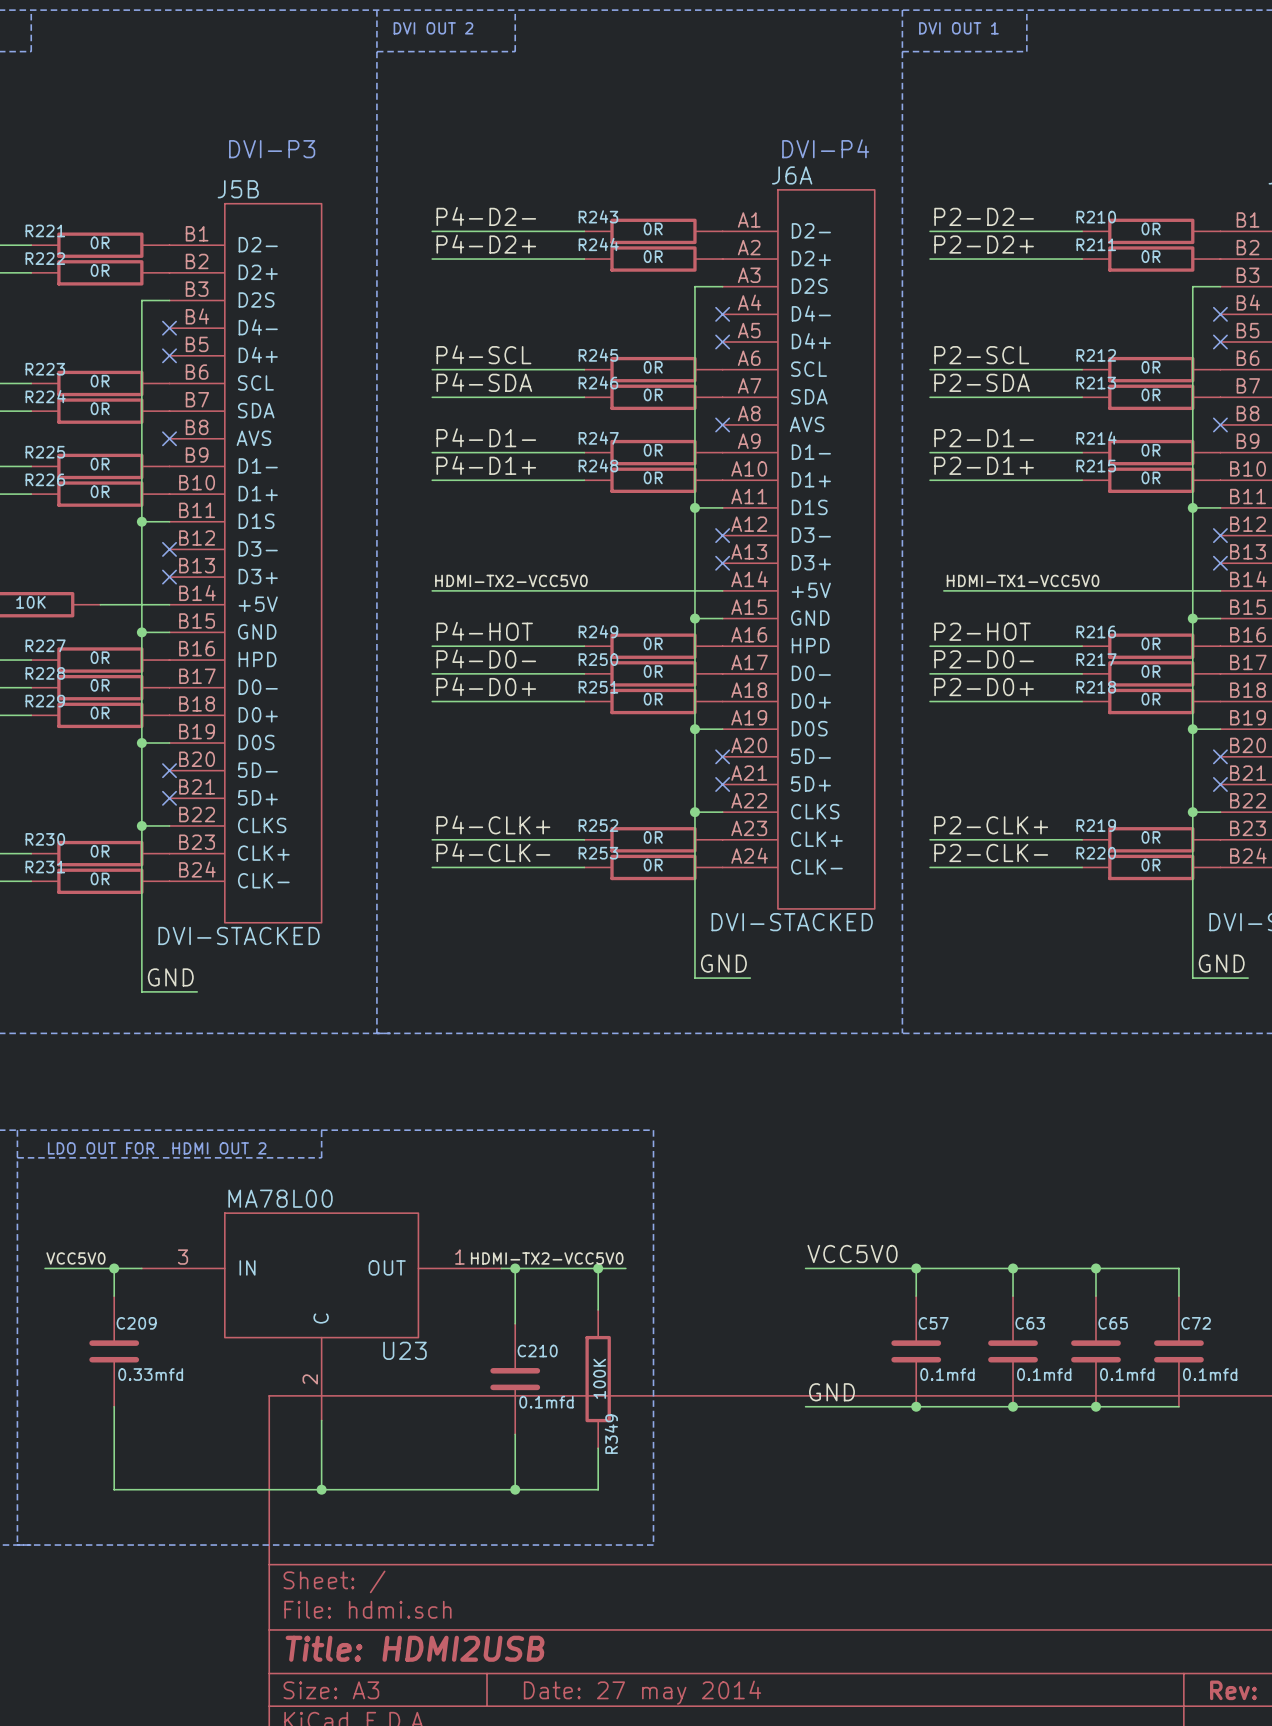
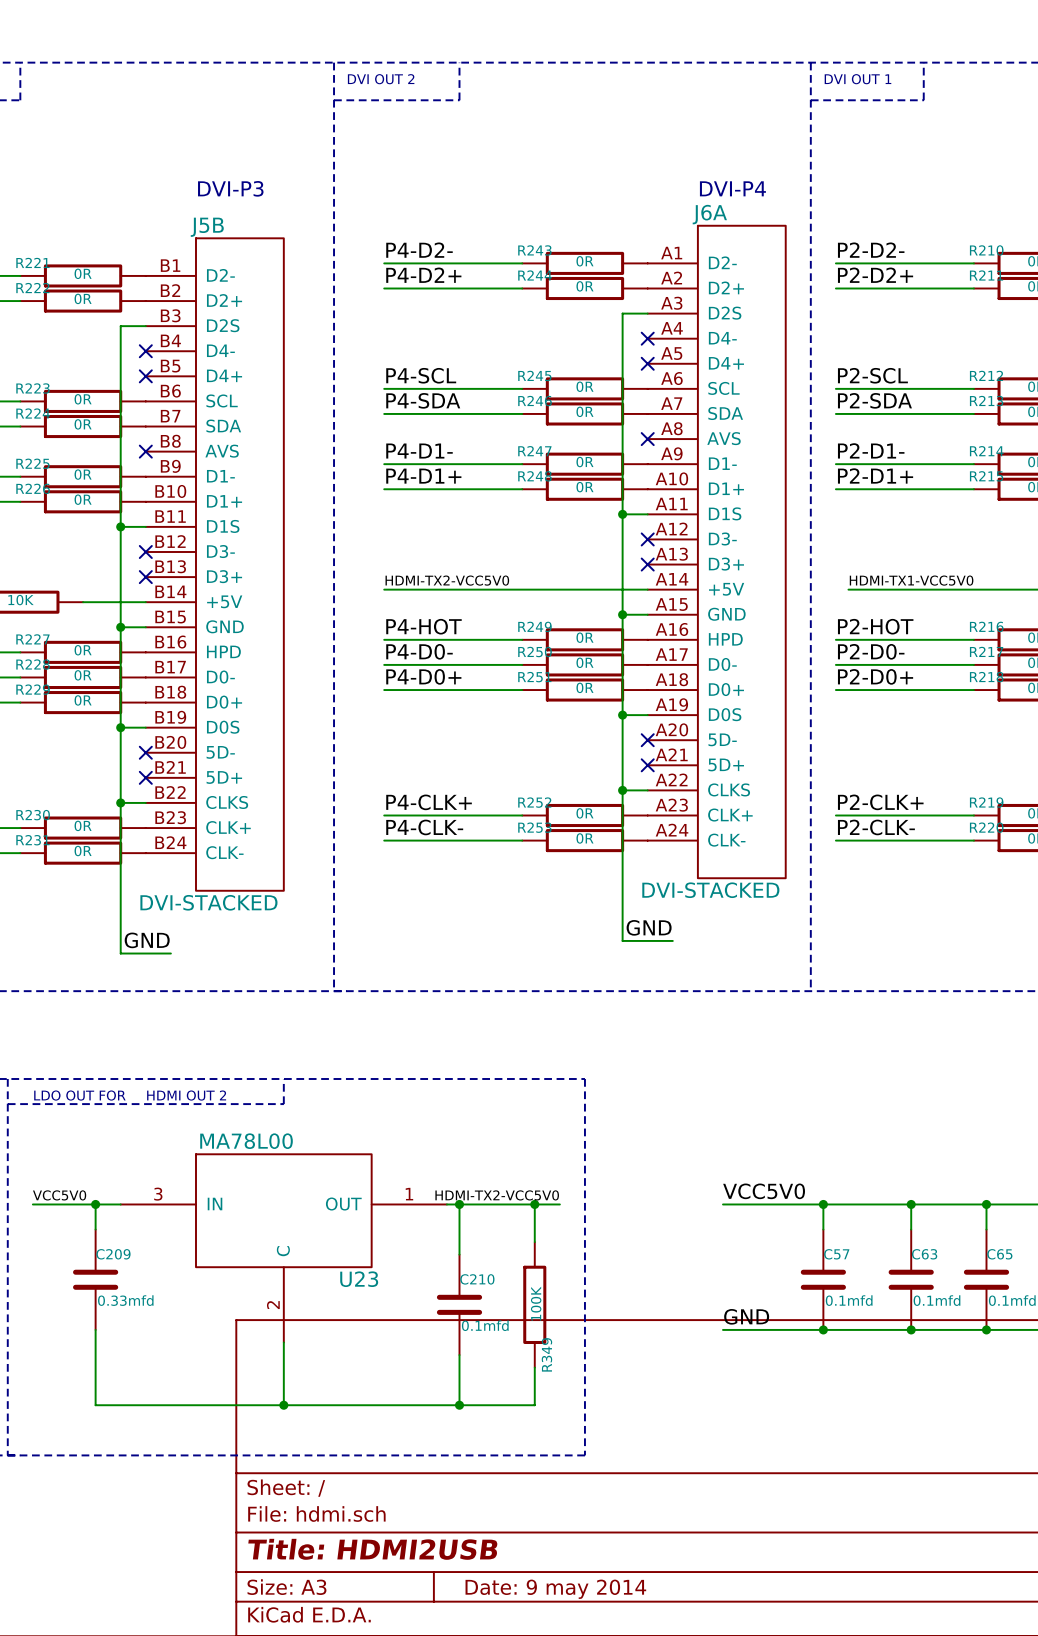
title block: Date: 27 may 2014 (642, 1692) -> Date: 9 may 2014 (555, 1589)

